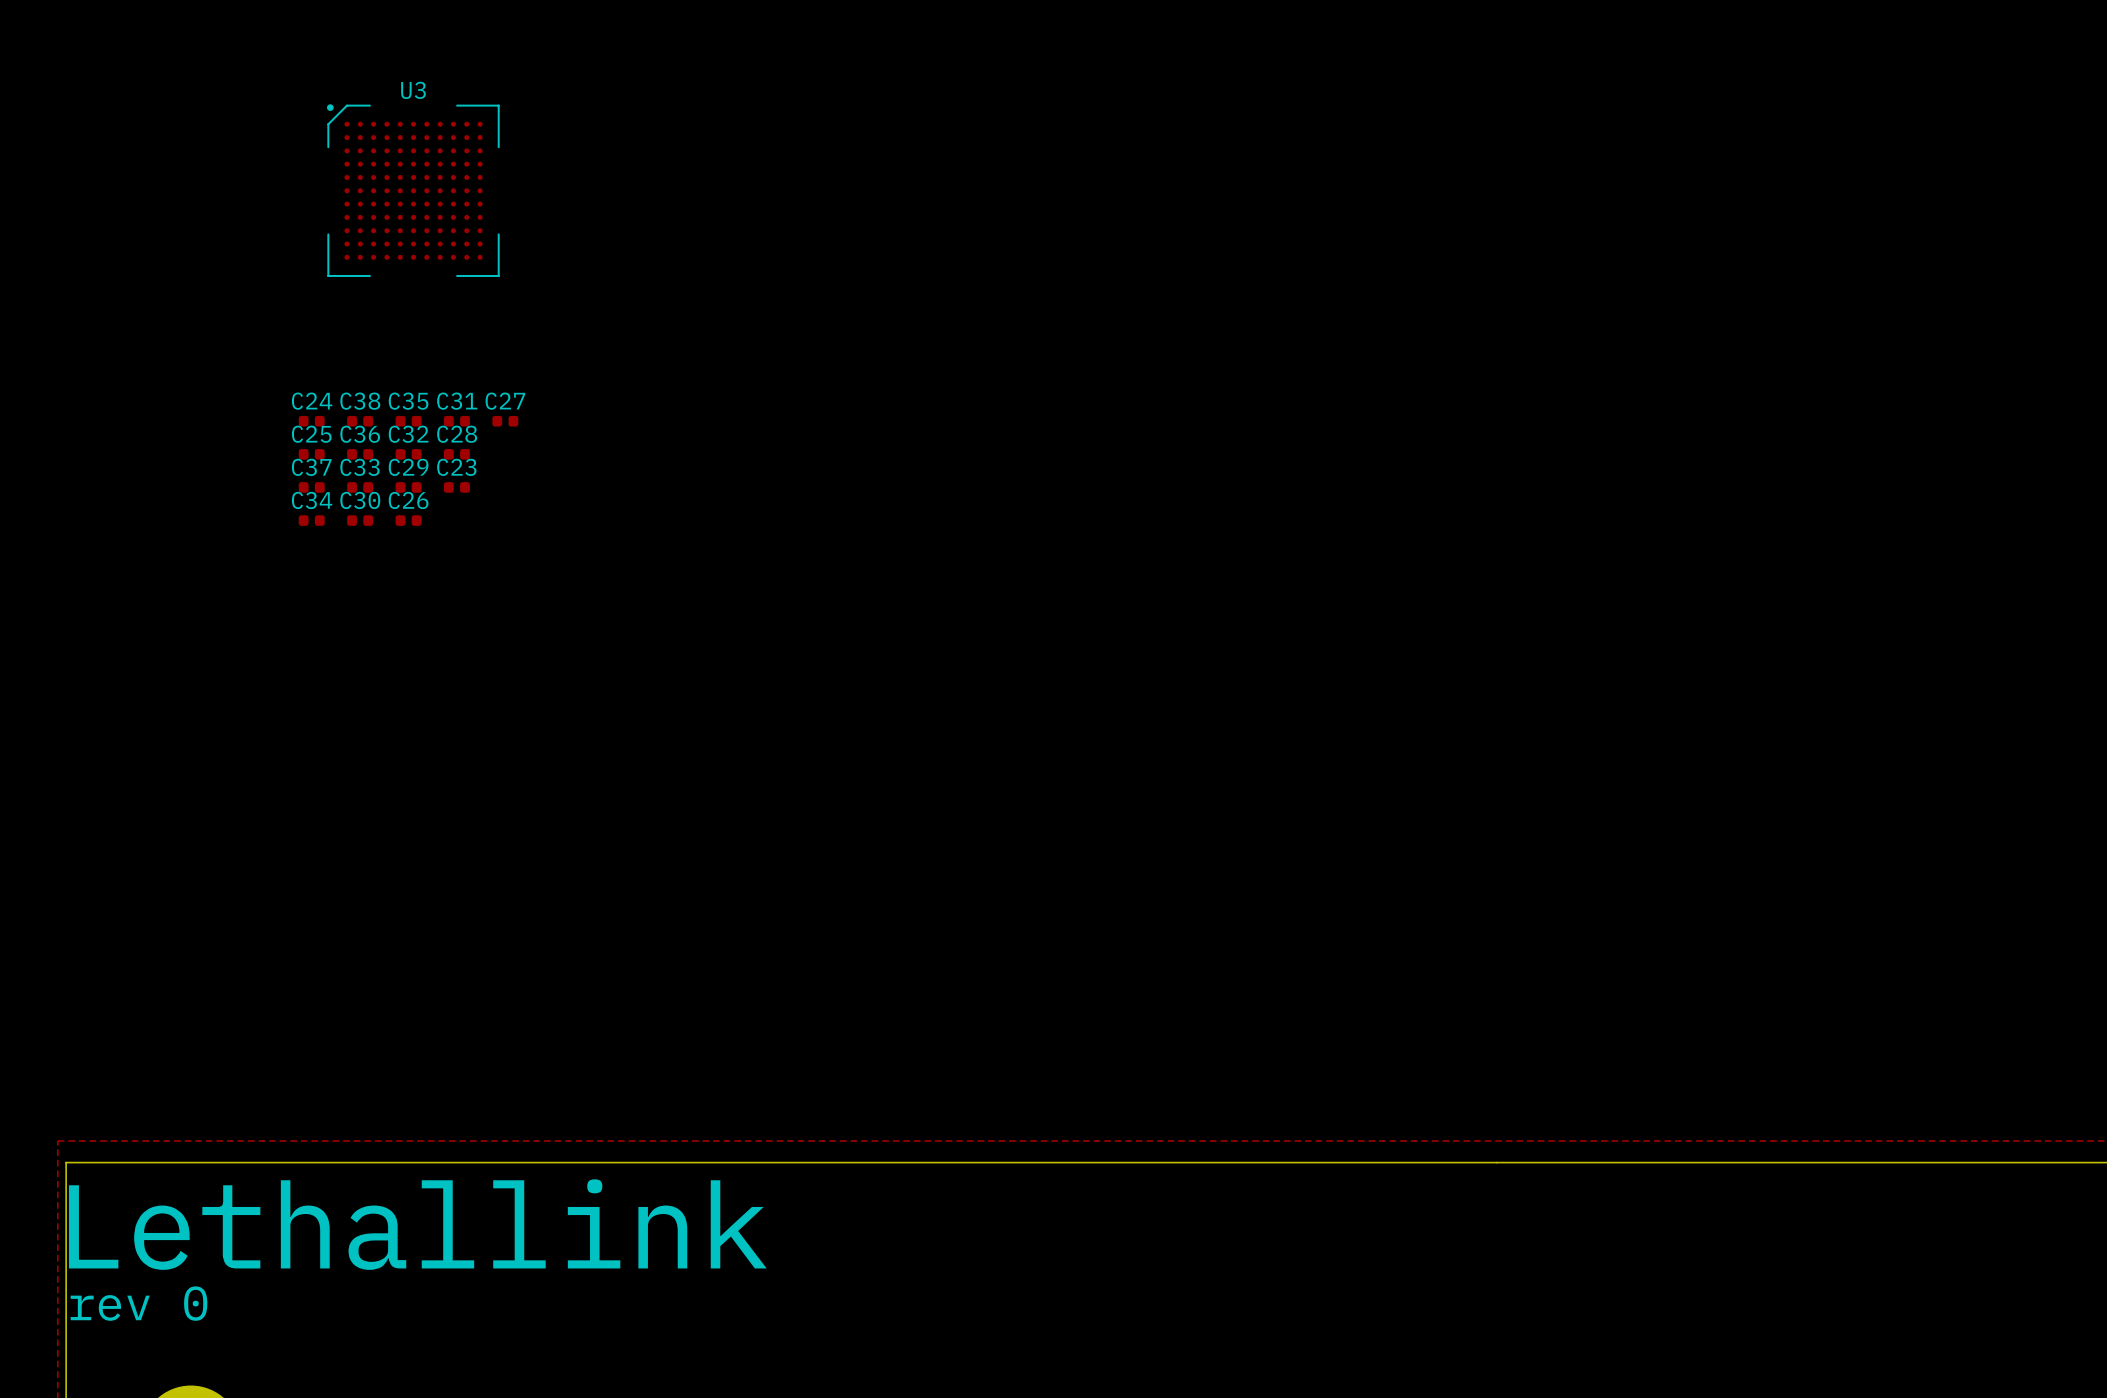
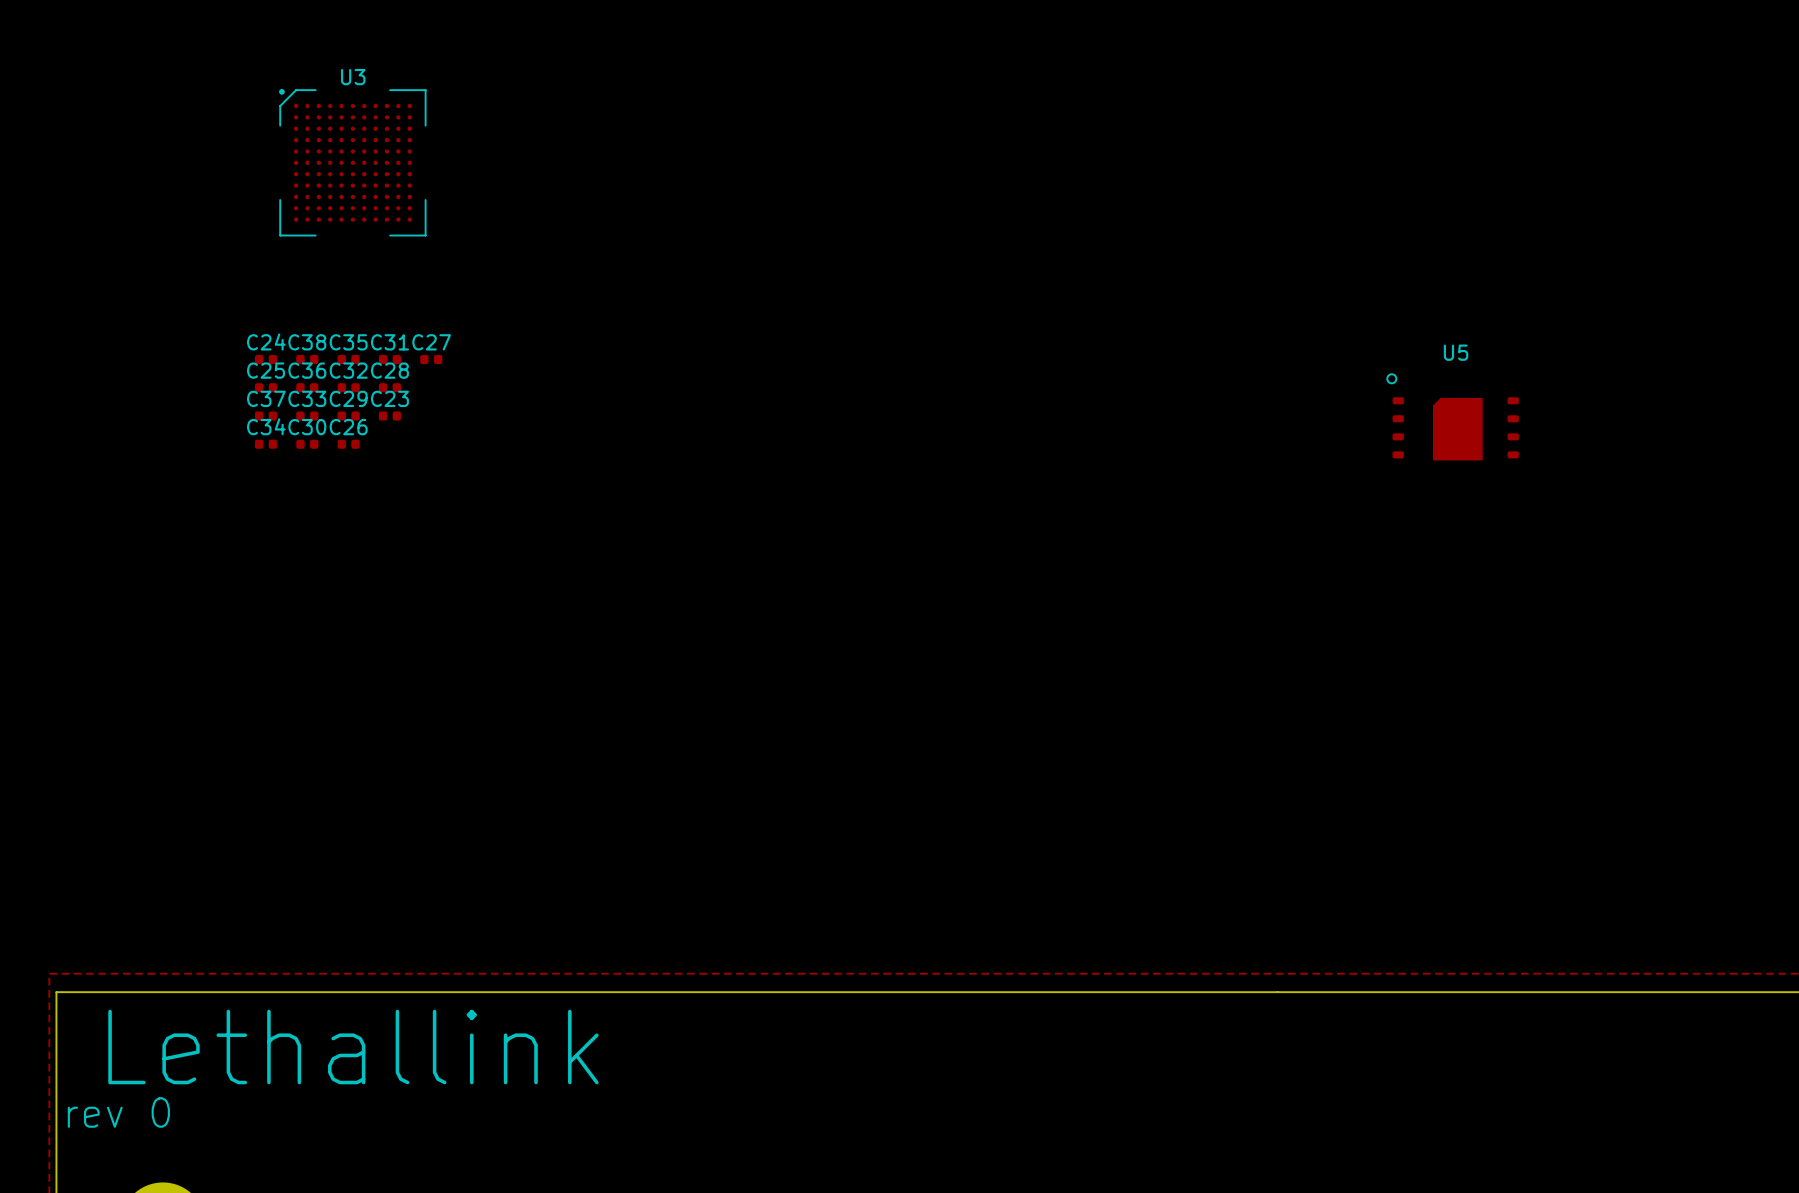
U5: none -> (1452, 416)

